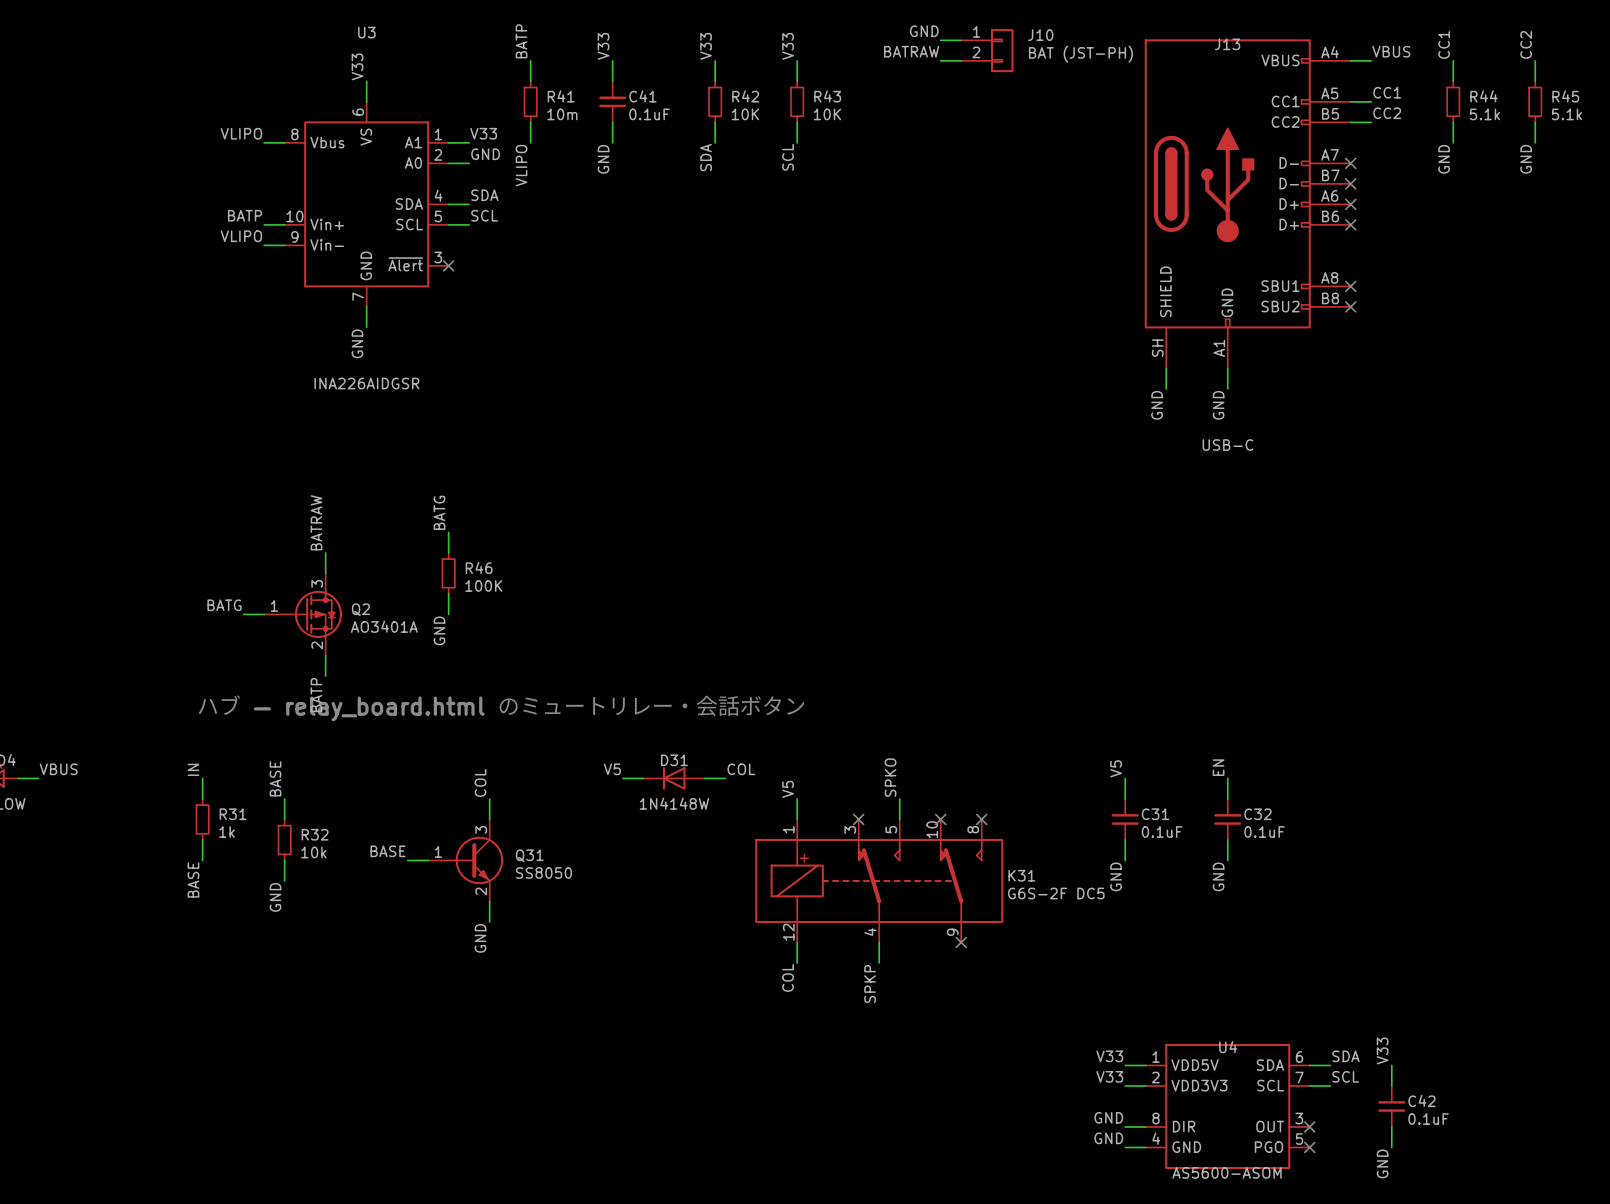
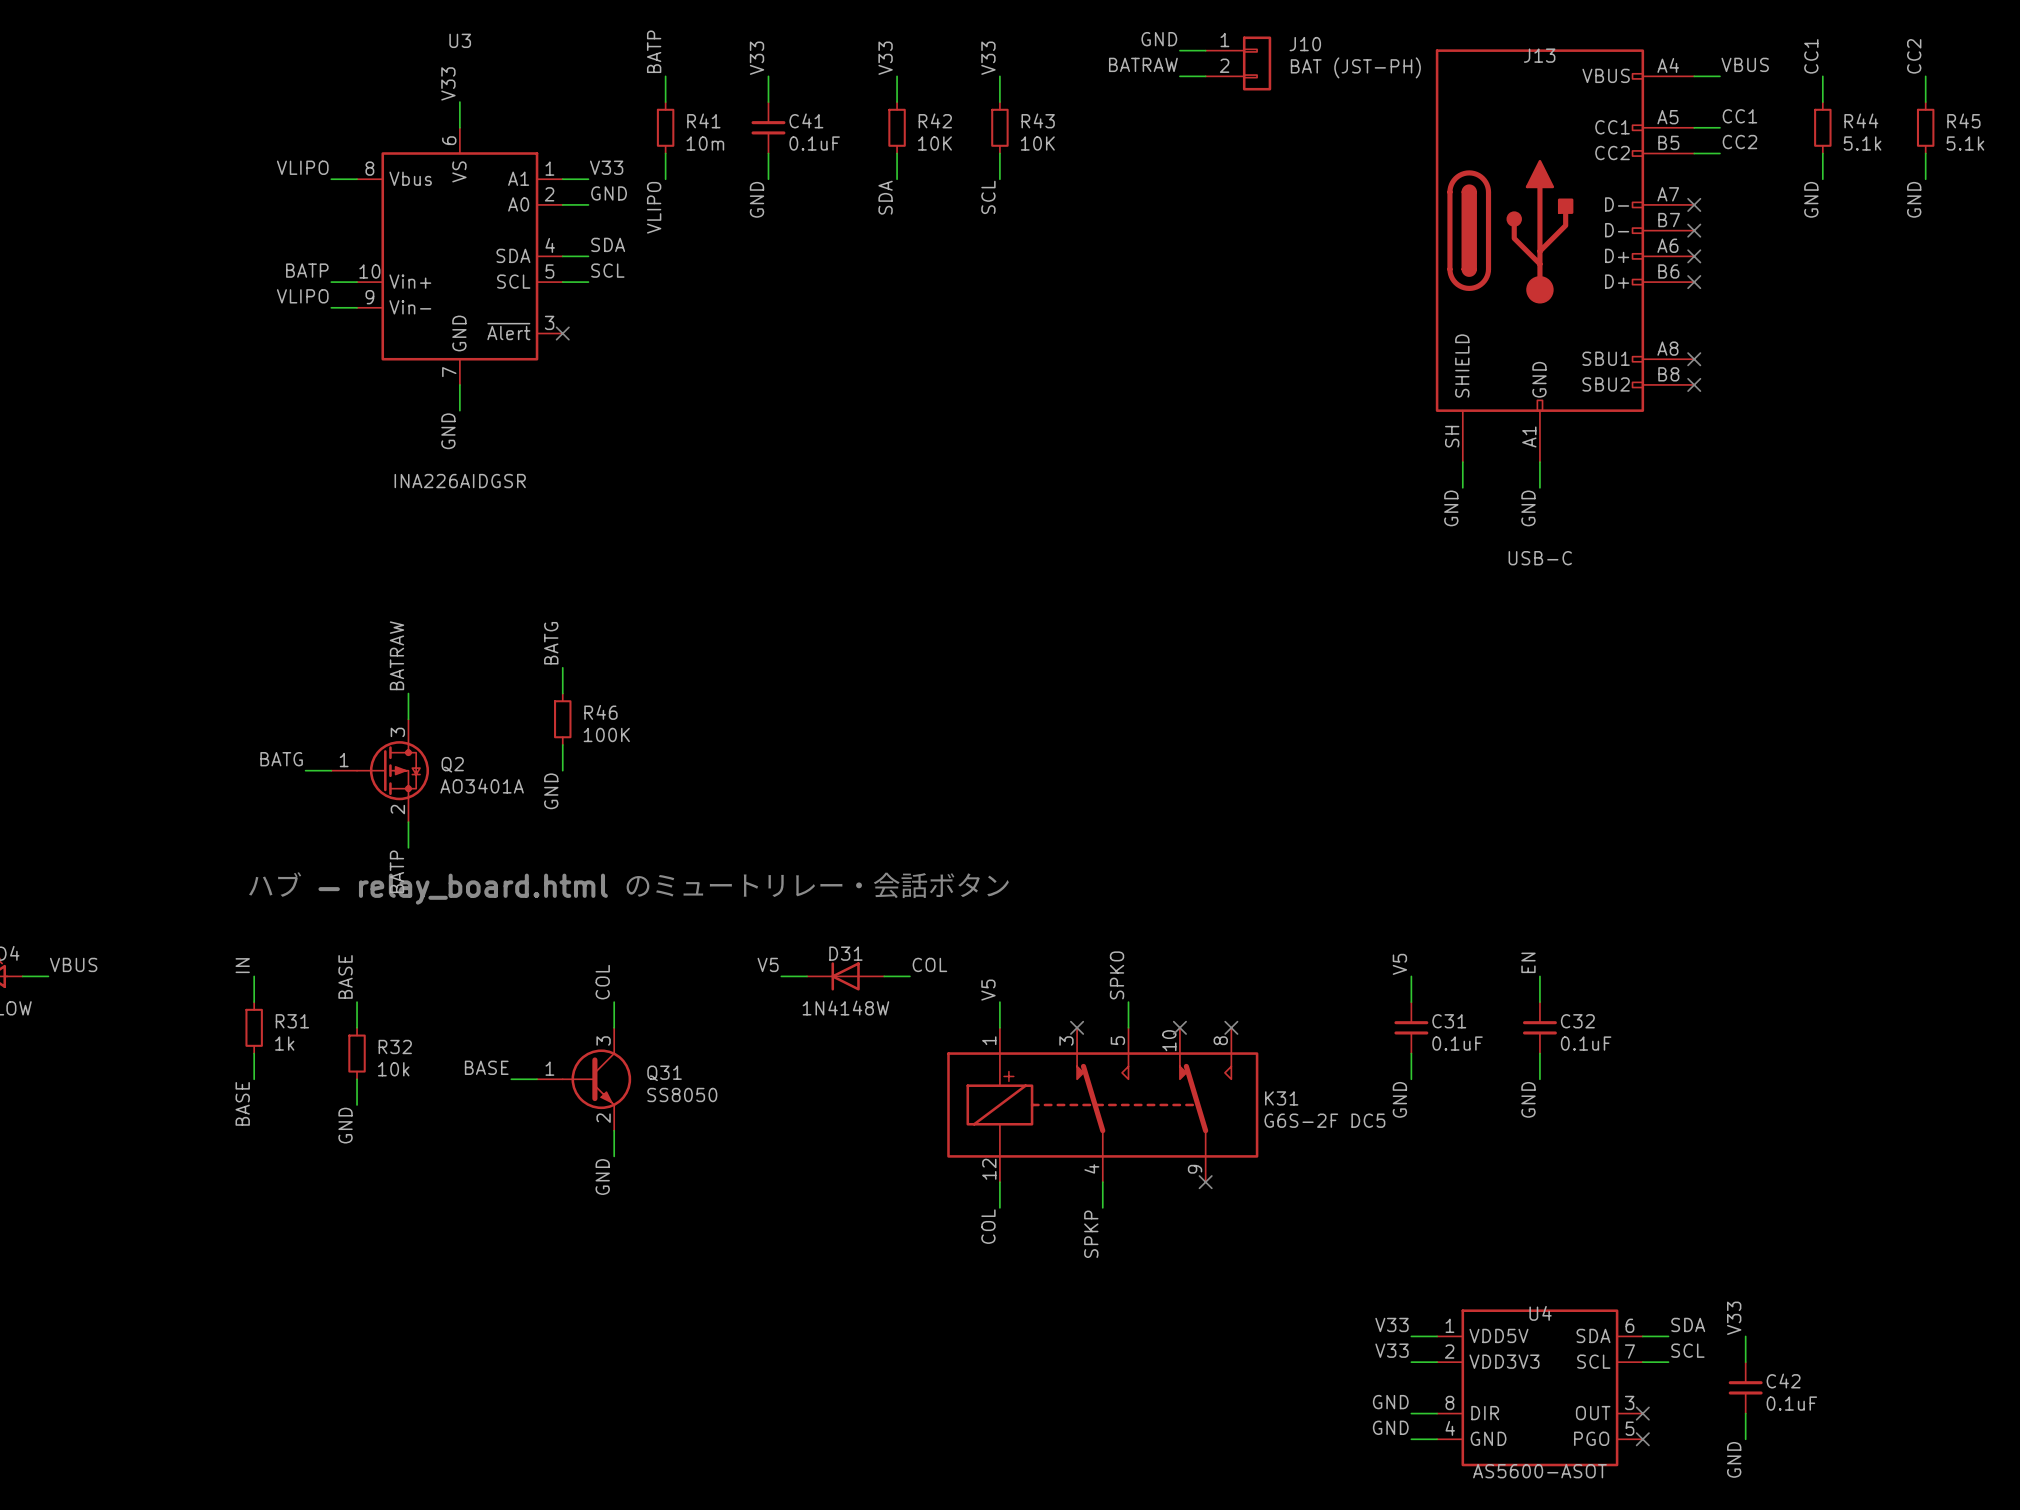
U4 value: AS5600-ASOM (1227, 1172) -> AS5600-ASOT (1539, 1471)

